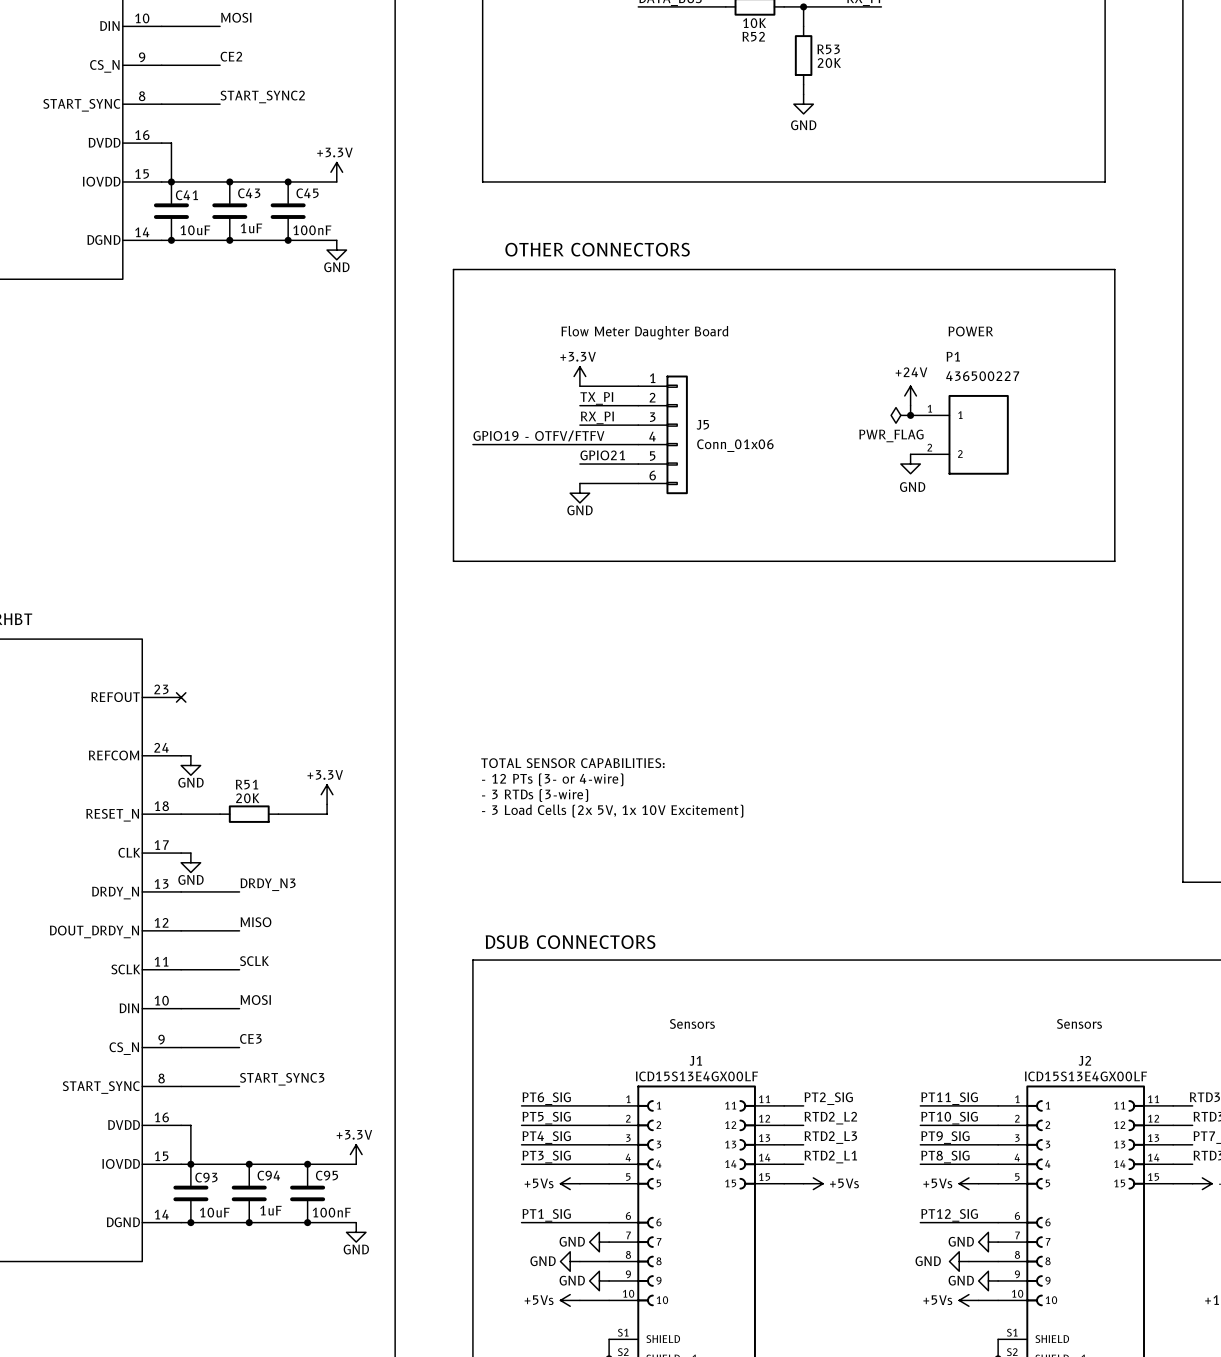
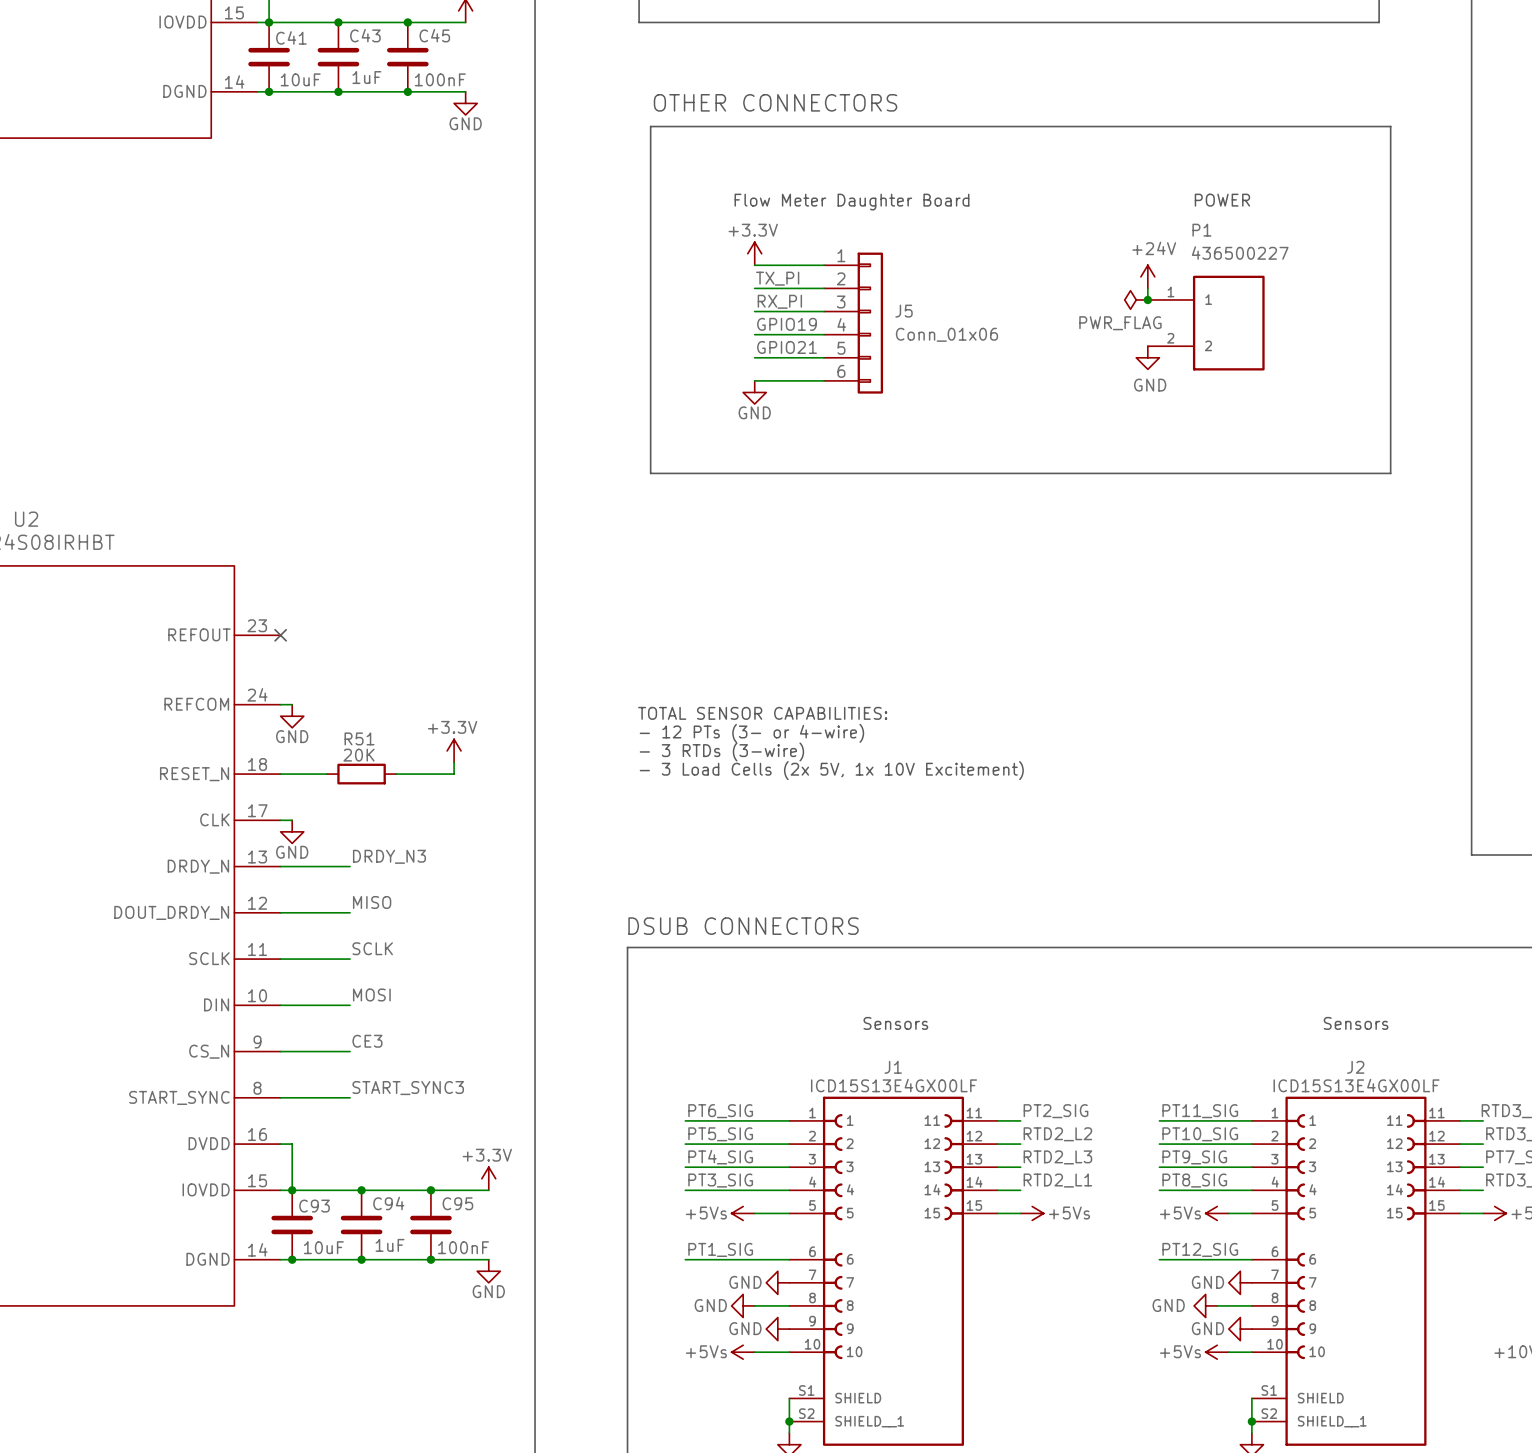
line: (492, 269) (453, 269) (453, 561) (492, 561) -> (650, 126) (650, 473)
label: GPIO19 - OTFV/FTFV (538, 435) -> none
label: none -> GPIO19 (787, 324)
wire: (472, 444) (579, 444) -> none

